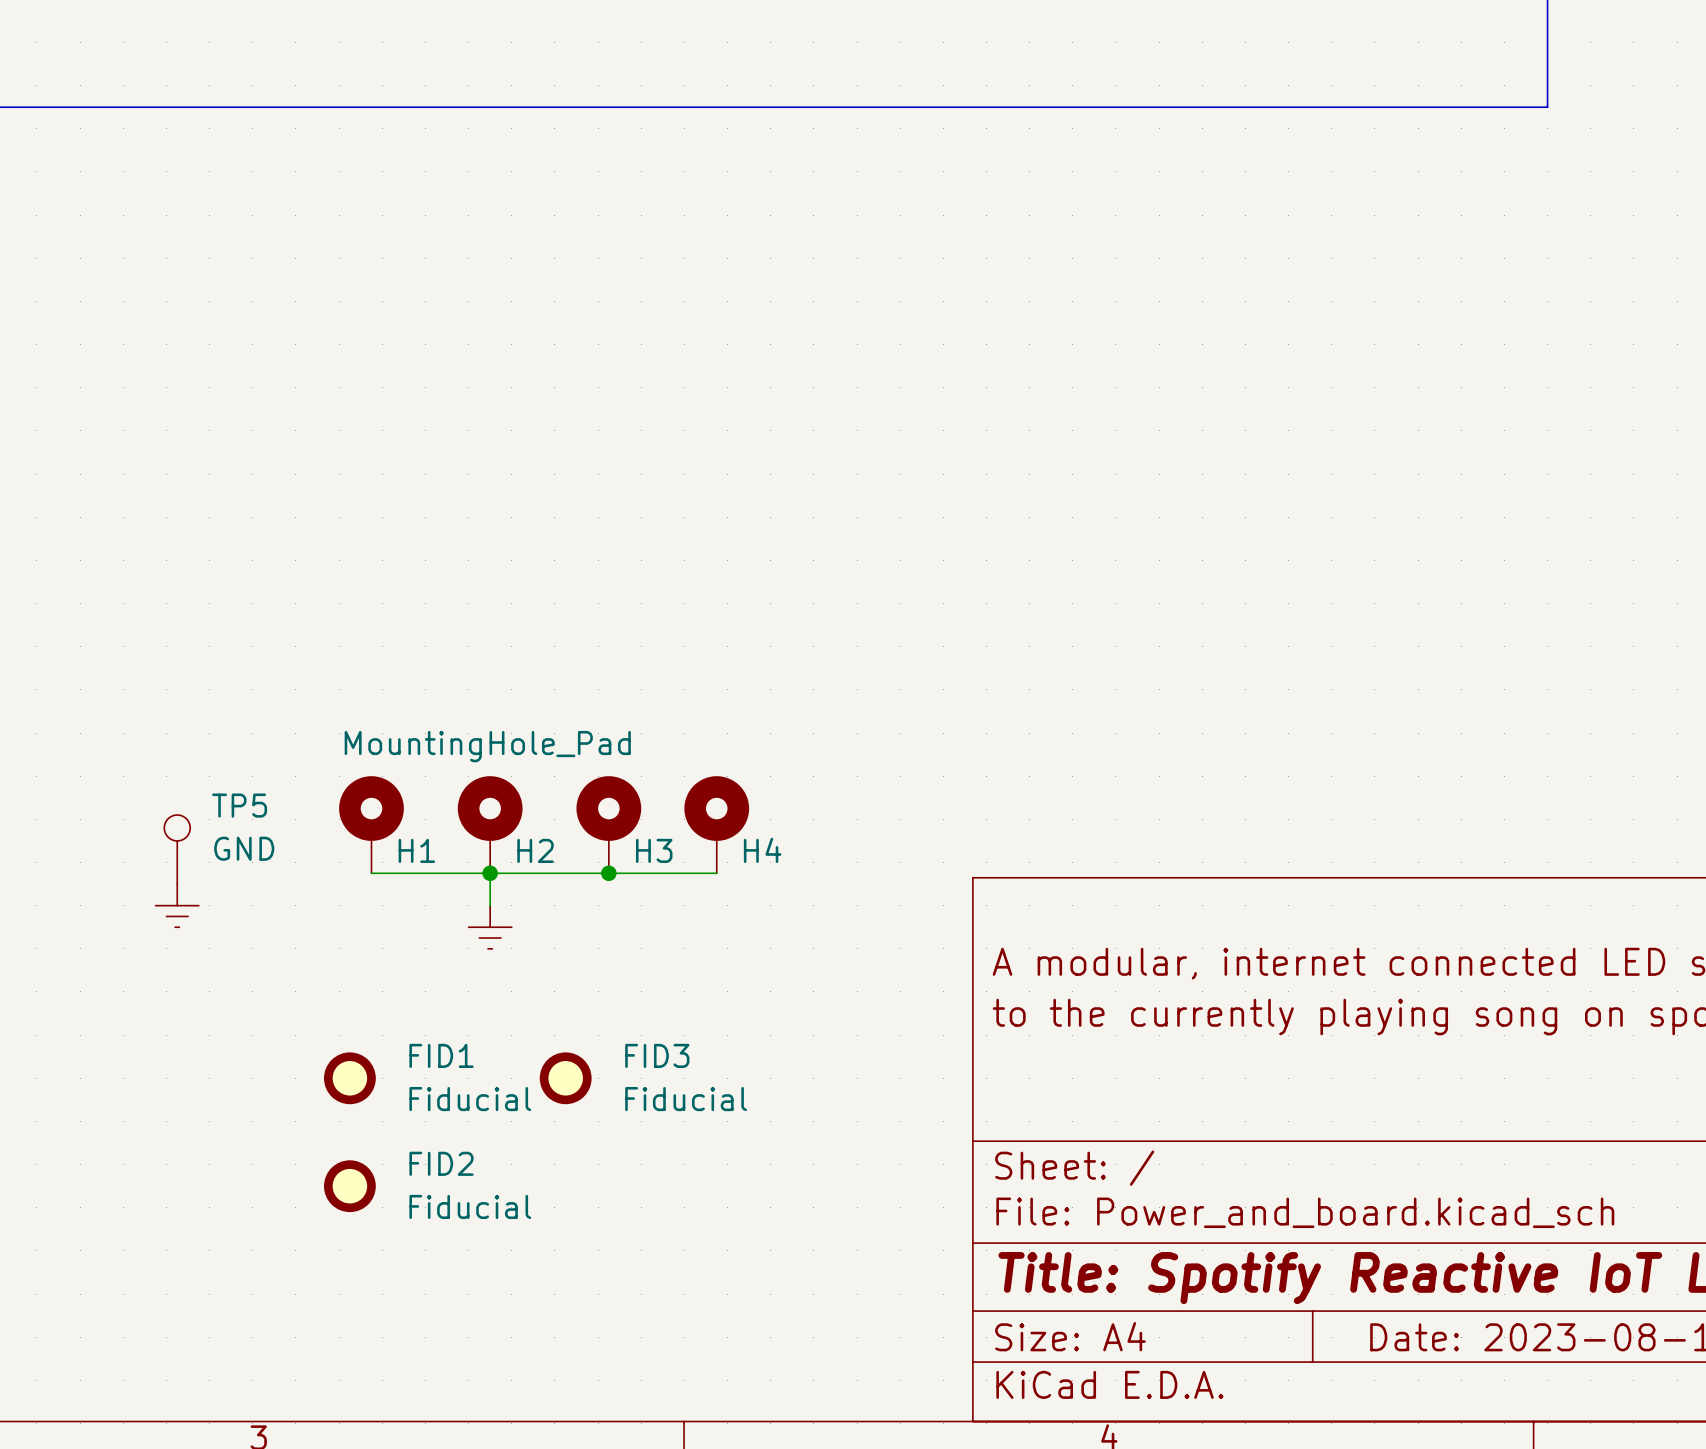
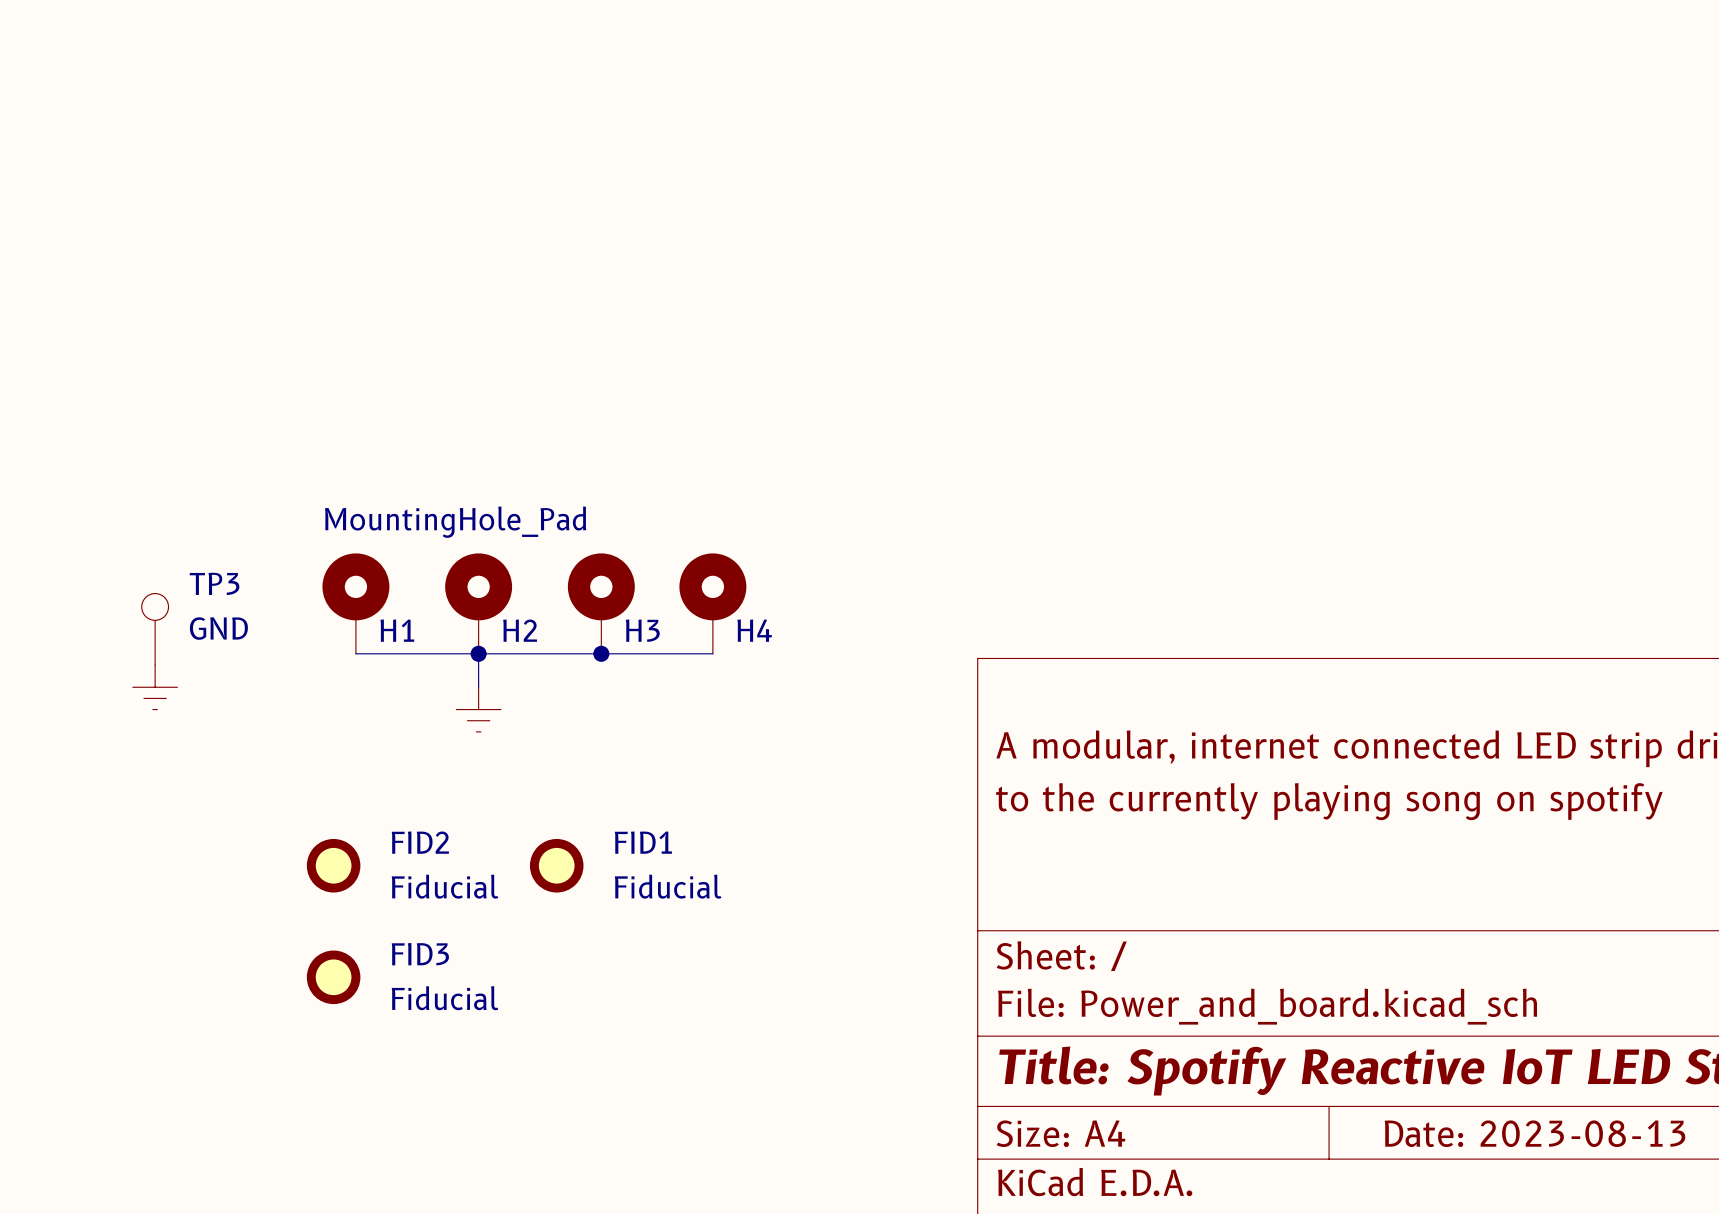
TP5 name: TP5 (239, 805) -> TP3 (214, 583)
FID1 name: FID1 (441, 1055) -> FID2 (420, 842)
FID3 name: FID3 (657, 1055) -> FID1 (643, 842)
FID2 name: FID2 (441, 1163) -> FID3 (420, 954)

